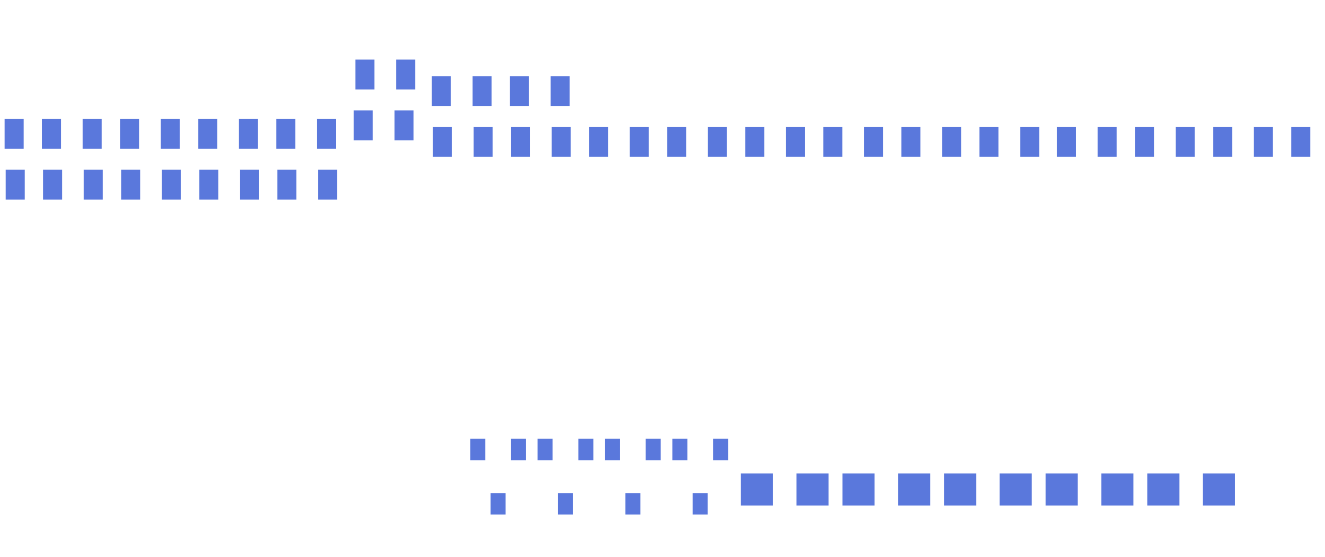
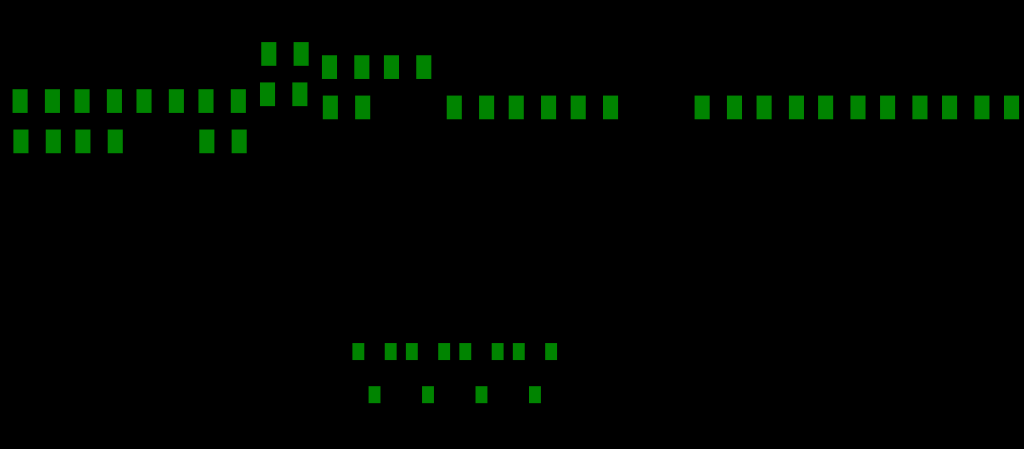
part: (540, 141) -> none
part: (853, 141) -> none
part: (229, 184) -> none
part: (784, 489) -> none
part: (886, 489) -> none
part: (987, 489) -> none
part: (1089, 489) -> none
part: (1191, 489) -> none

